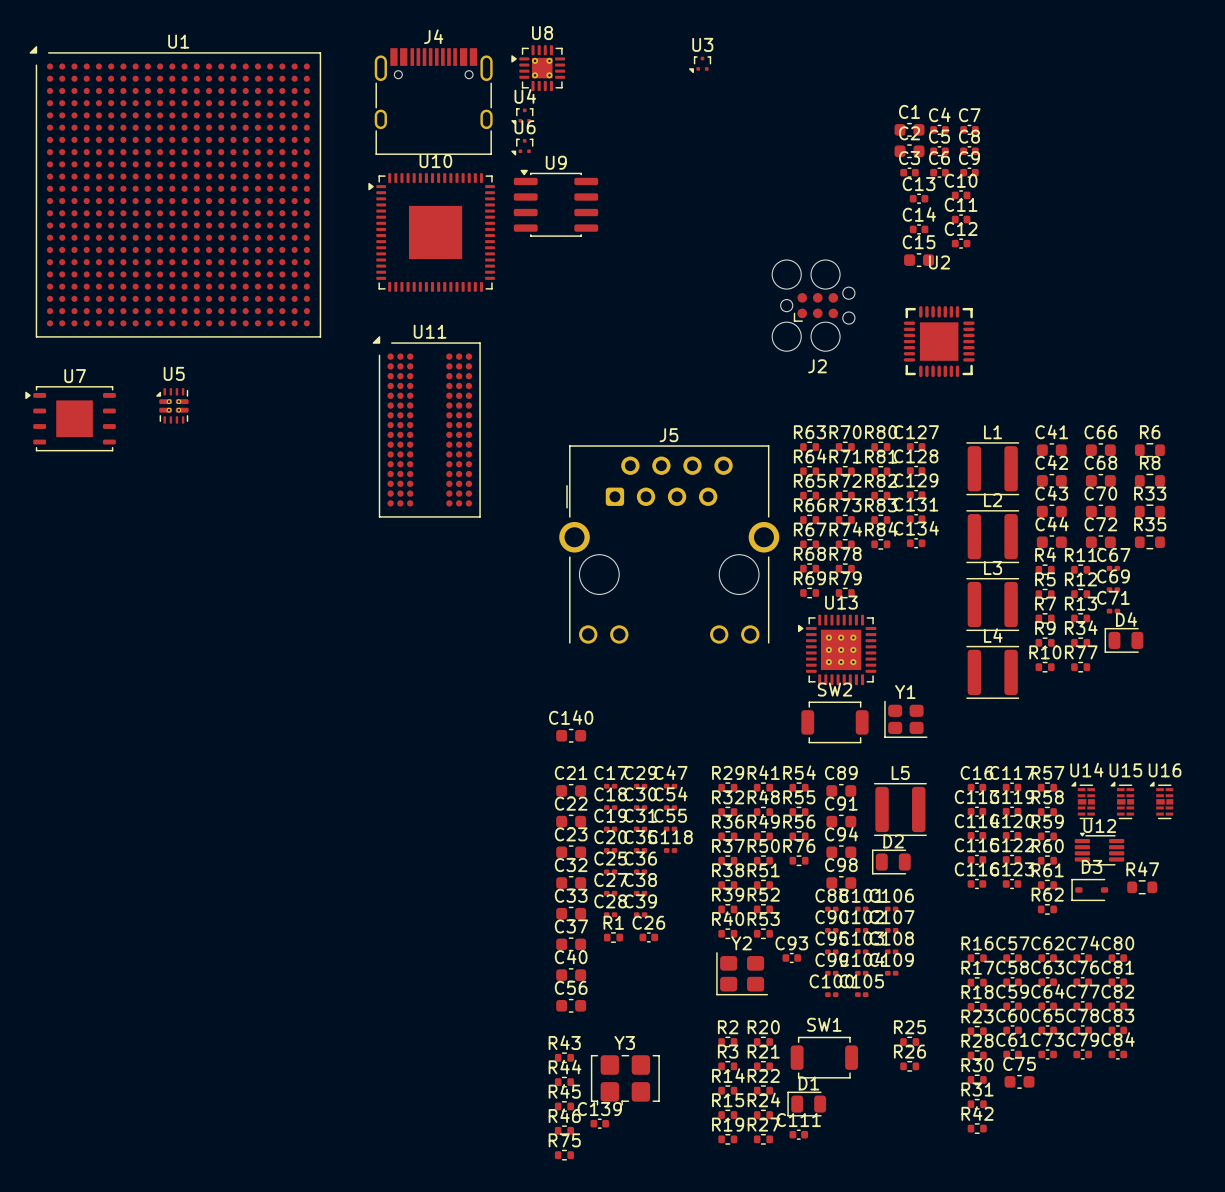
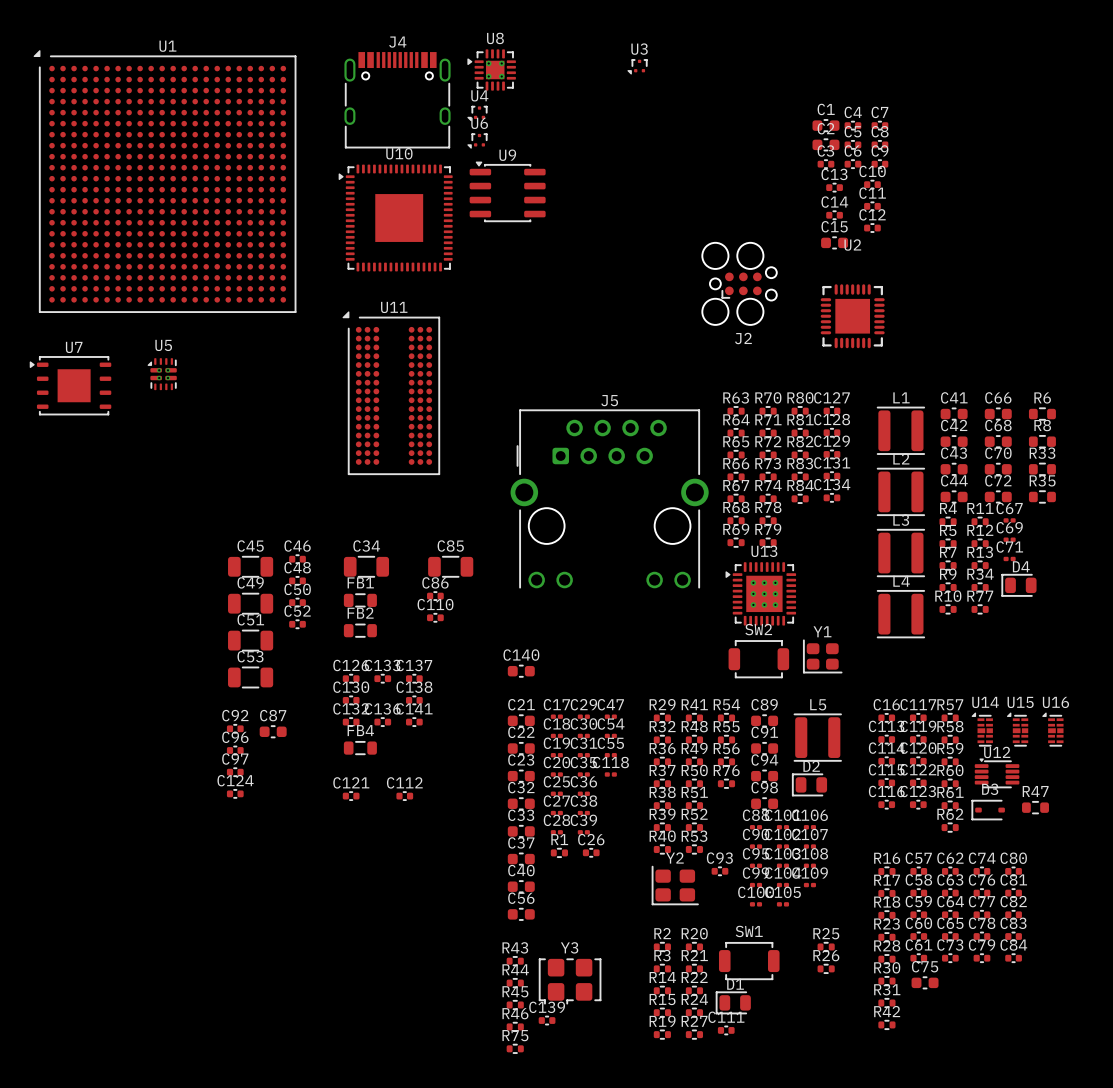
C46: none -> (297, 559)
C45: none -> (250, 566)
C34: none -> (366, 566)
C85: none -> (450, 566)
C48: none -> (297, 580)
C86: none -> (435, 596)
FB1: none -> (360, 600)
C50: none -> (297, 602)
C49: none -> (250, 603)
C110: none -> (435, 617)
C52: none -> (297, 624)
FB2: none -> (360, 630)
C51: none -> (250, 640)
C53: none -> (250, 677)
C126: none -> (351, 678)
C133: none -> (382, 678)
C137: none -> (414, 678)
C130: none -> (351, 700)
C138: none -> (414, 700)
C132: none -> (351, 722)
C136: none -> (382, 722)
C141: none -> (414, 722)
C92: none -> (235, 728)
C87: none -> (273, 731)
FB4: none -> (360, 748)
C96: none -> (235, 750)
C97: none -> (235, 772)
C124: none -> (235, 793)
C121: none -> (351, 796)
C112: none -> (404, 796)

